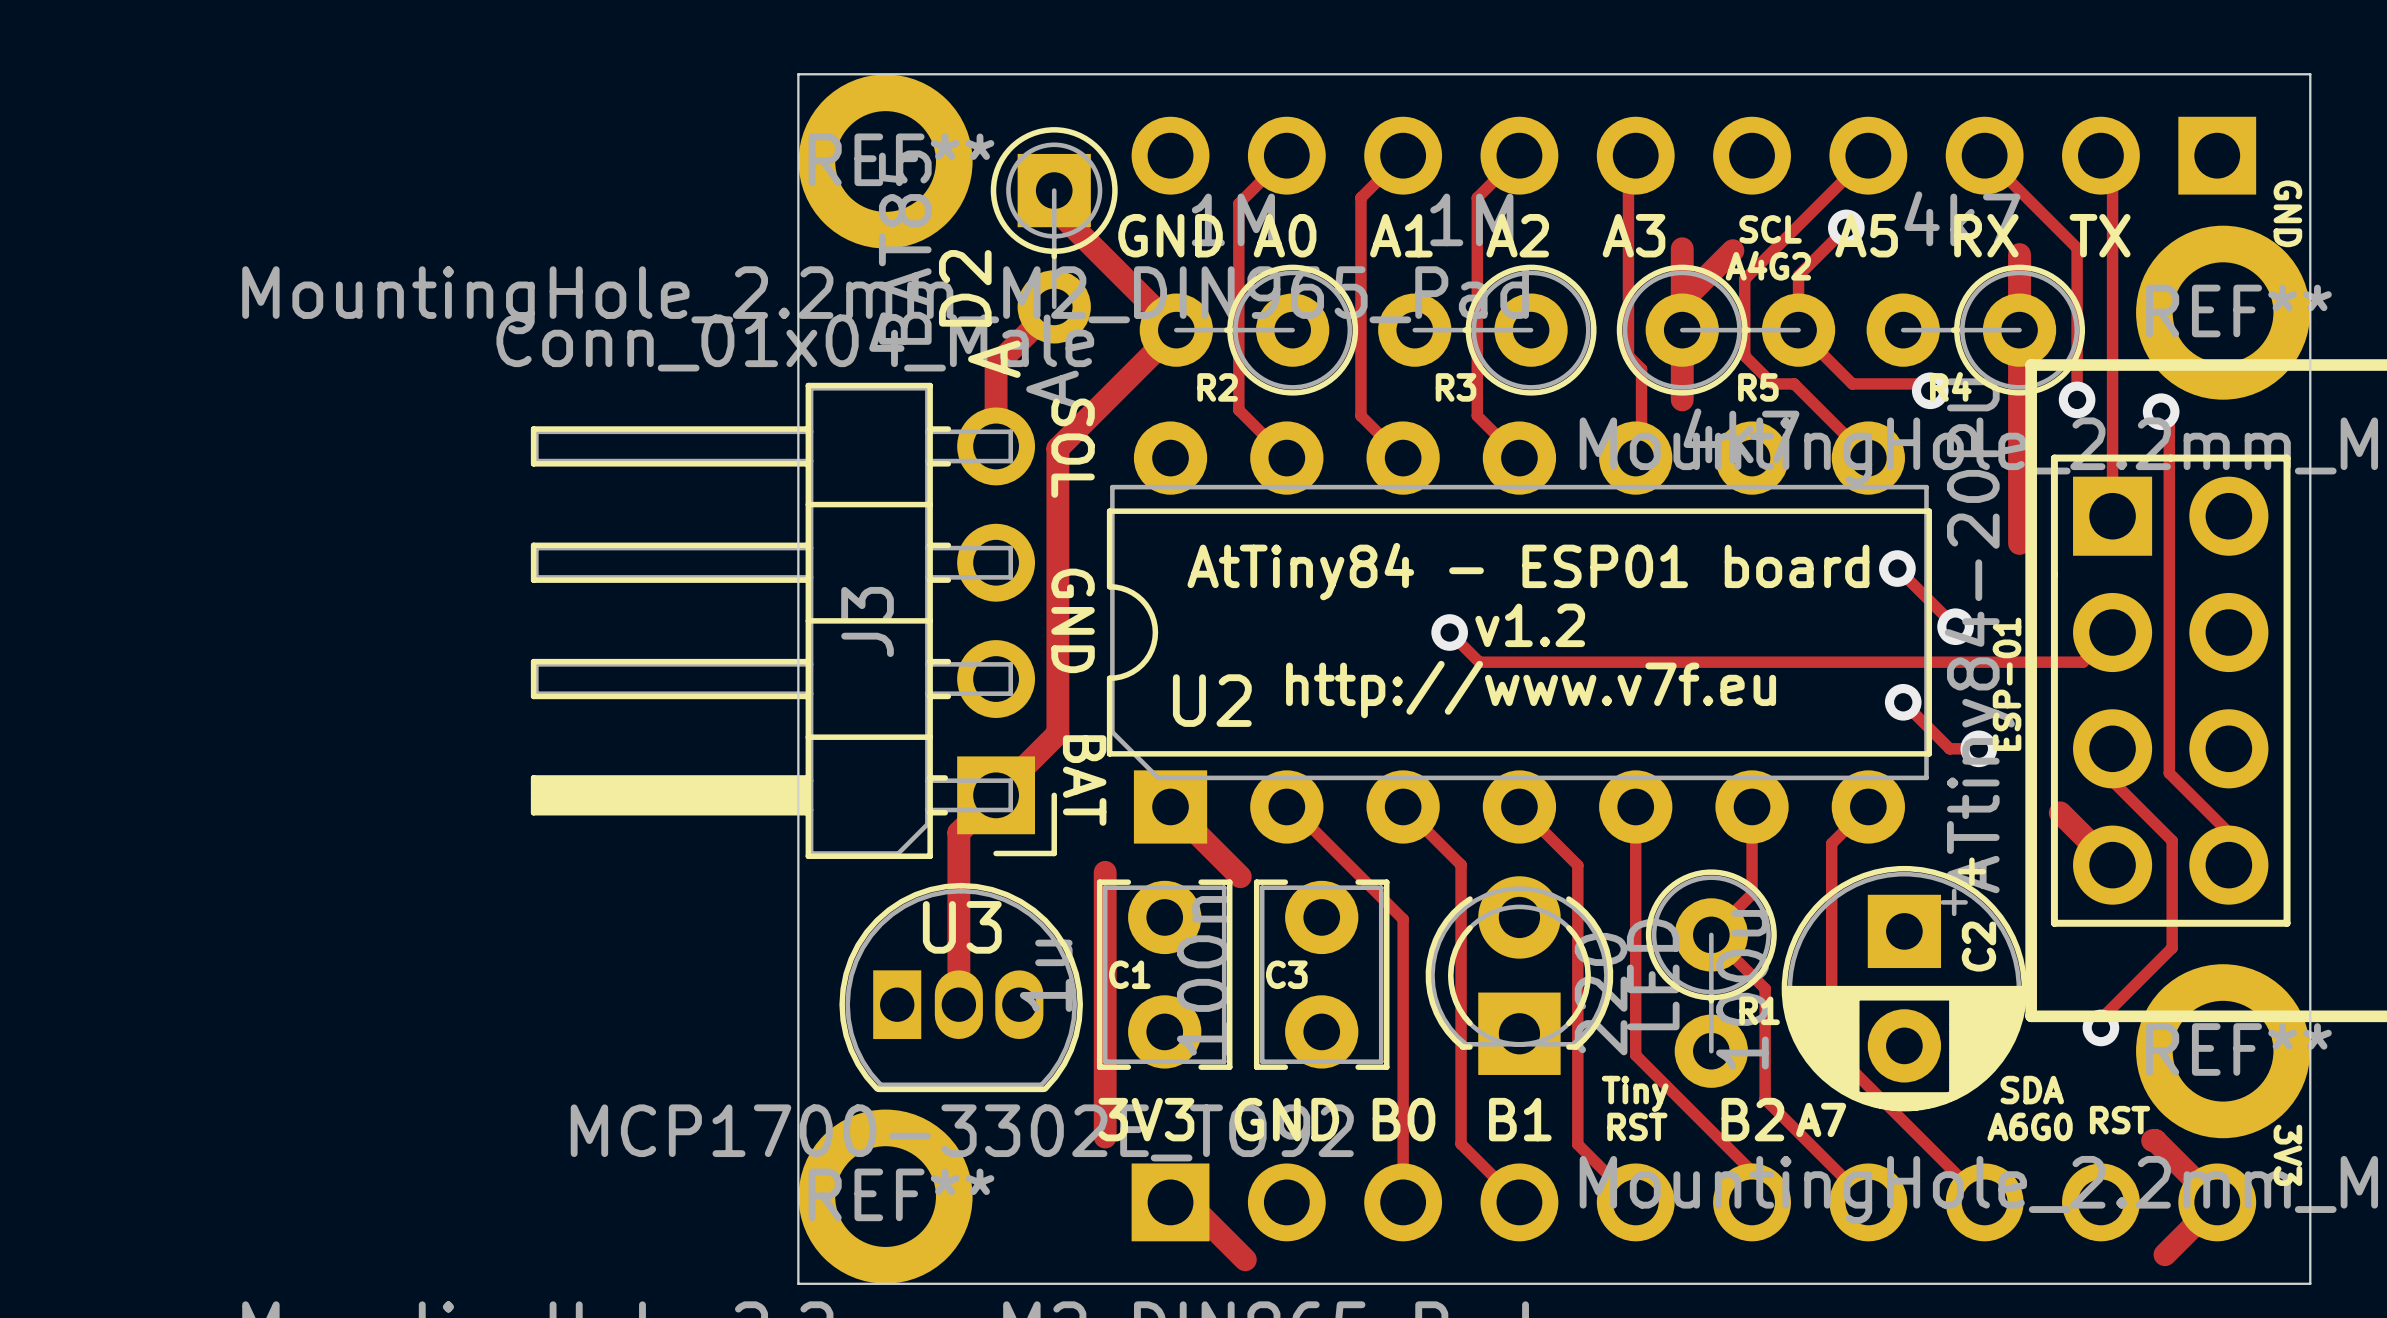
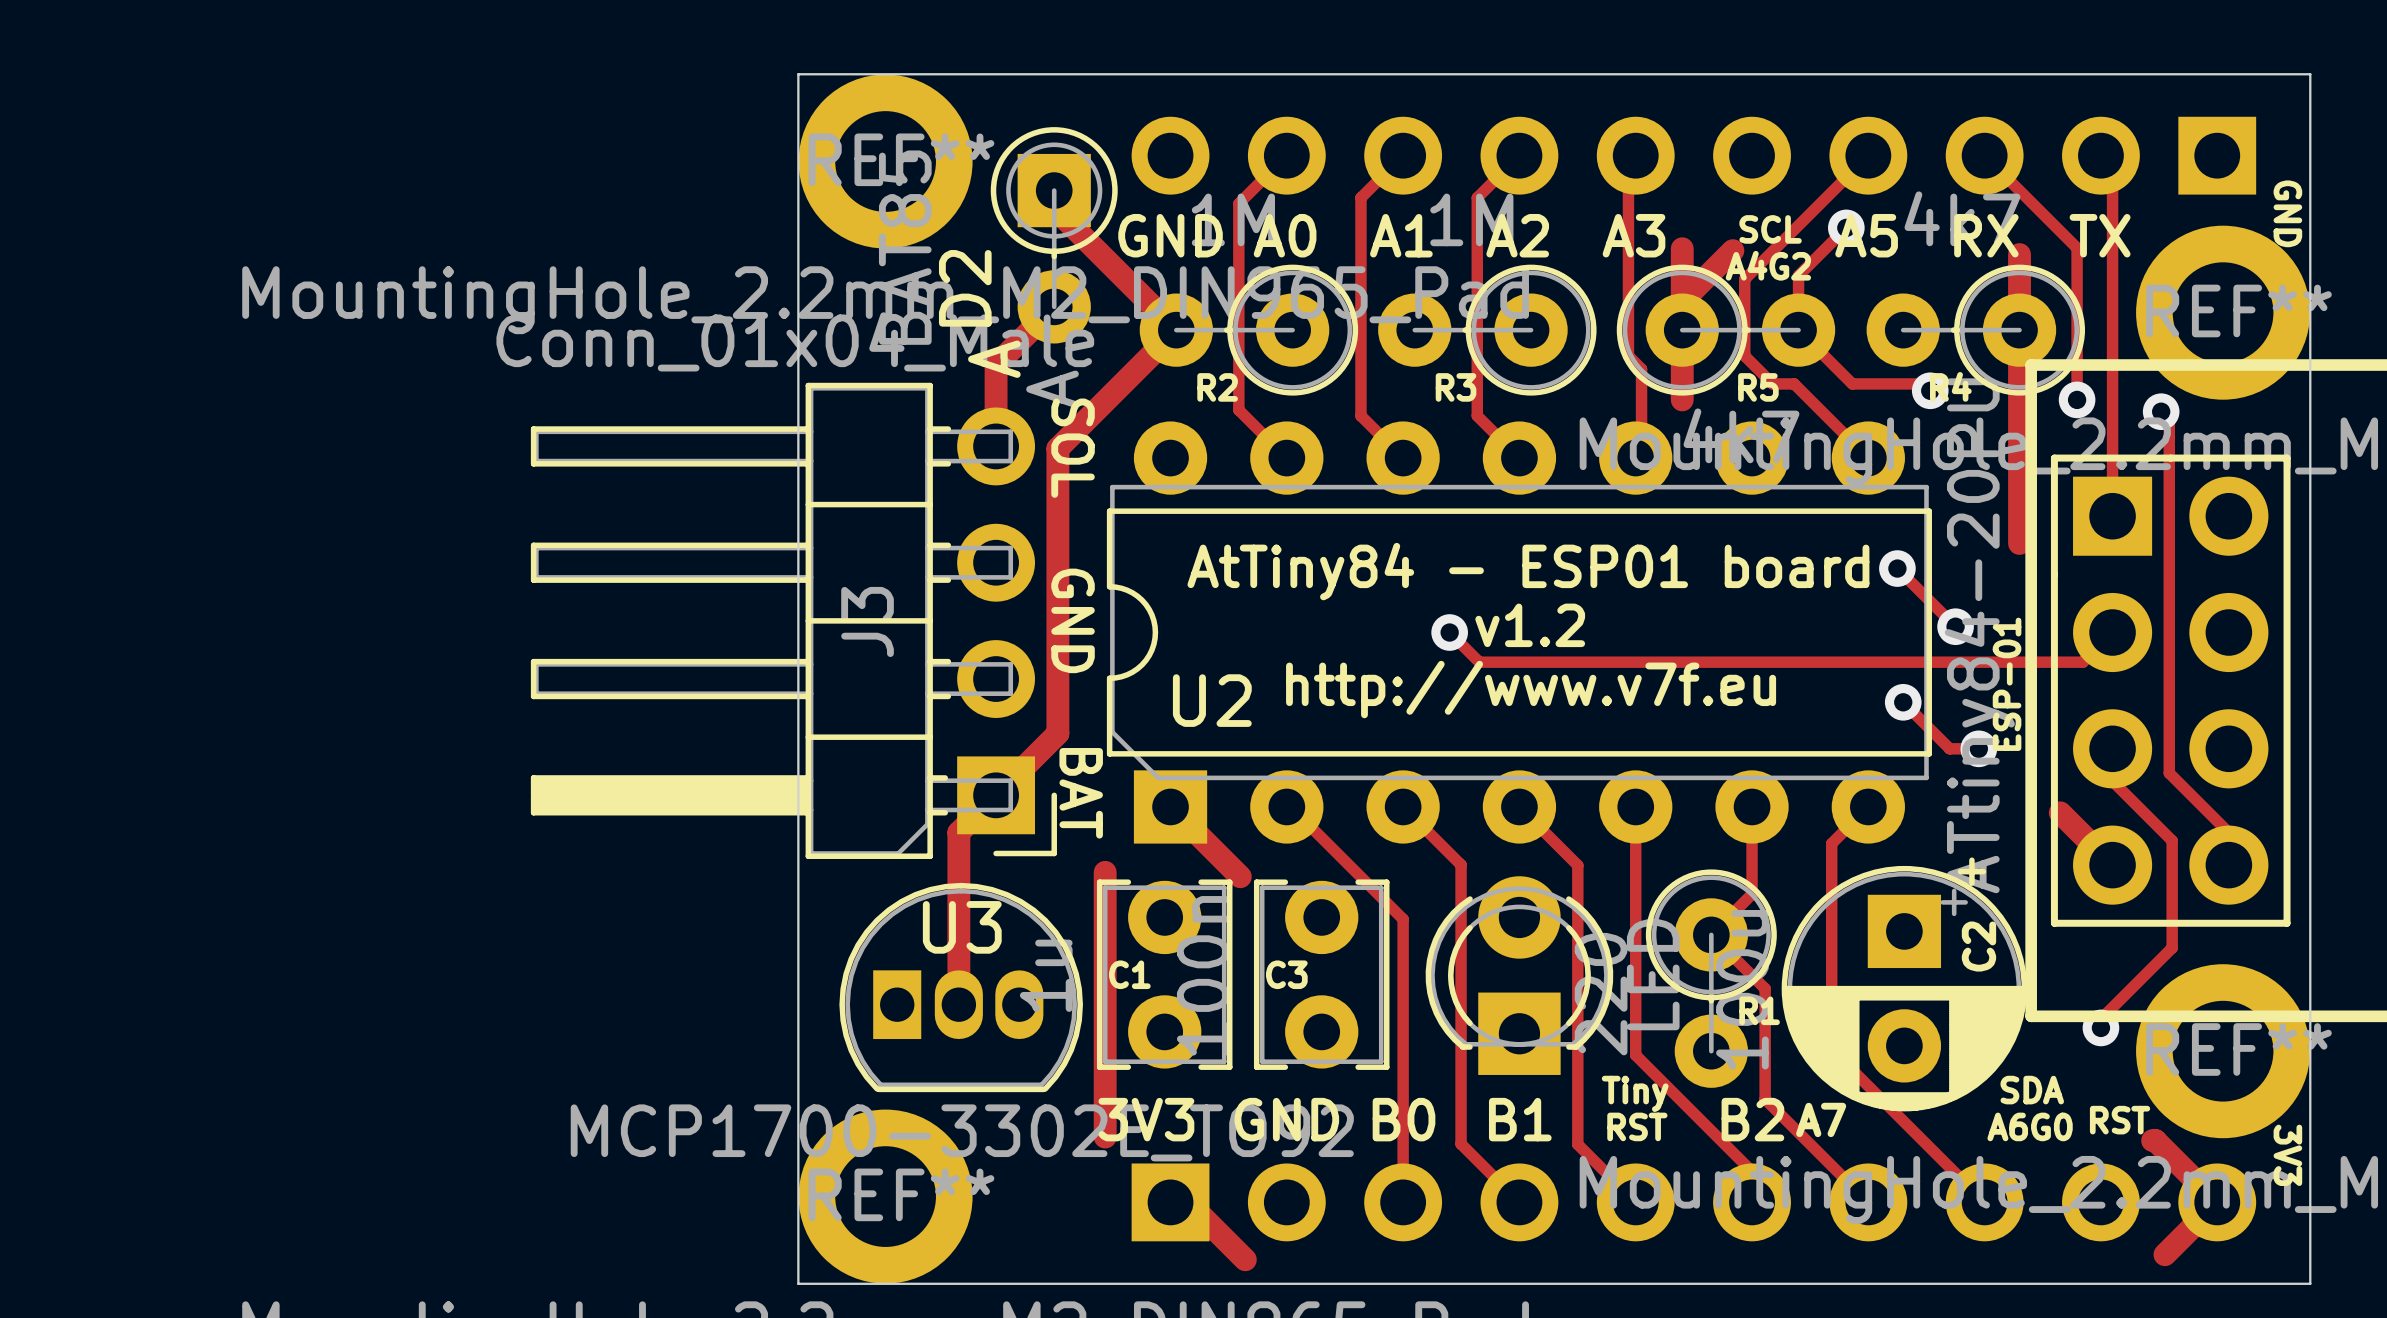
text position: BAT (1084, 780) -> BAT (1081, 793)

